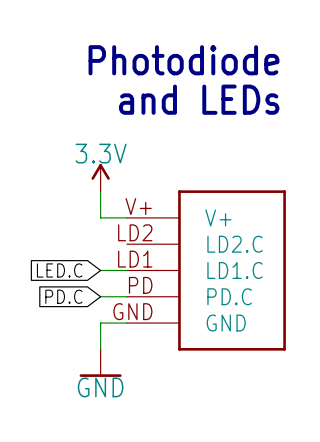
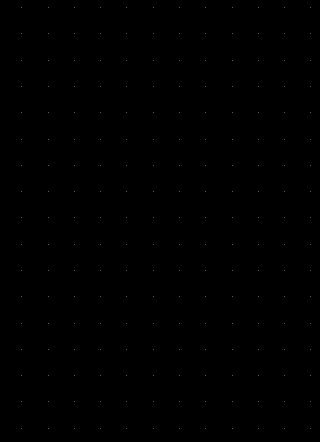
text: Photodiode (184, 60) -> none
text: and LEDs (199, 99) -> none
power symbol: 3.3V (100, 177) -> none
wire: (100, 191) (100, 217) (126, 217) -> none
global label: LED.C (59, 270) -> none
wire: (100, 270) (126, 270) -> none
part: (206, 270) -> none
global label: PD.C (63, 296) -> none
wire: (100, 296) (126, 296) -> none
wire: (126, 323) (100, 323) (100, 349) -> none
power symbol: GND (100, 363) -> none

